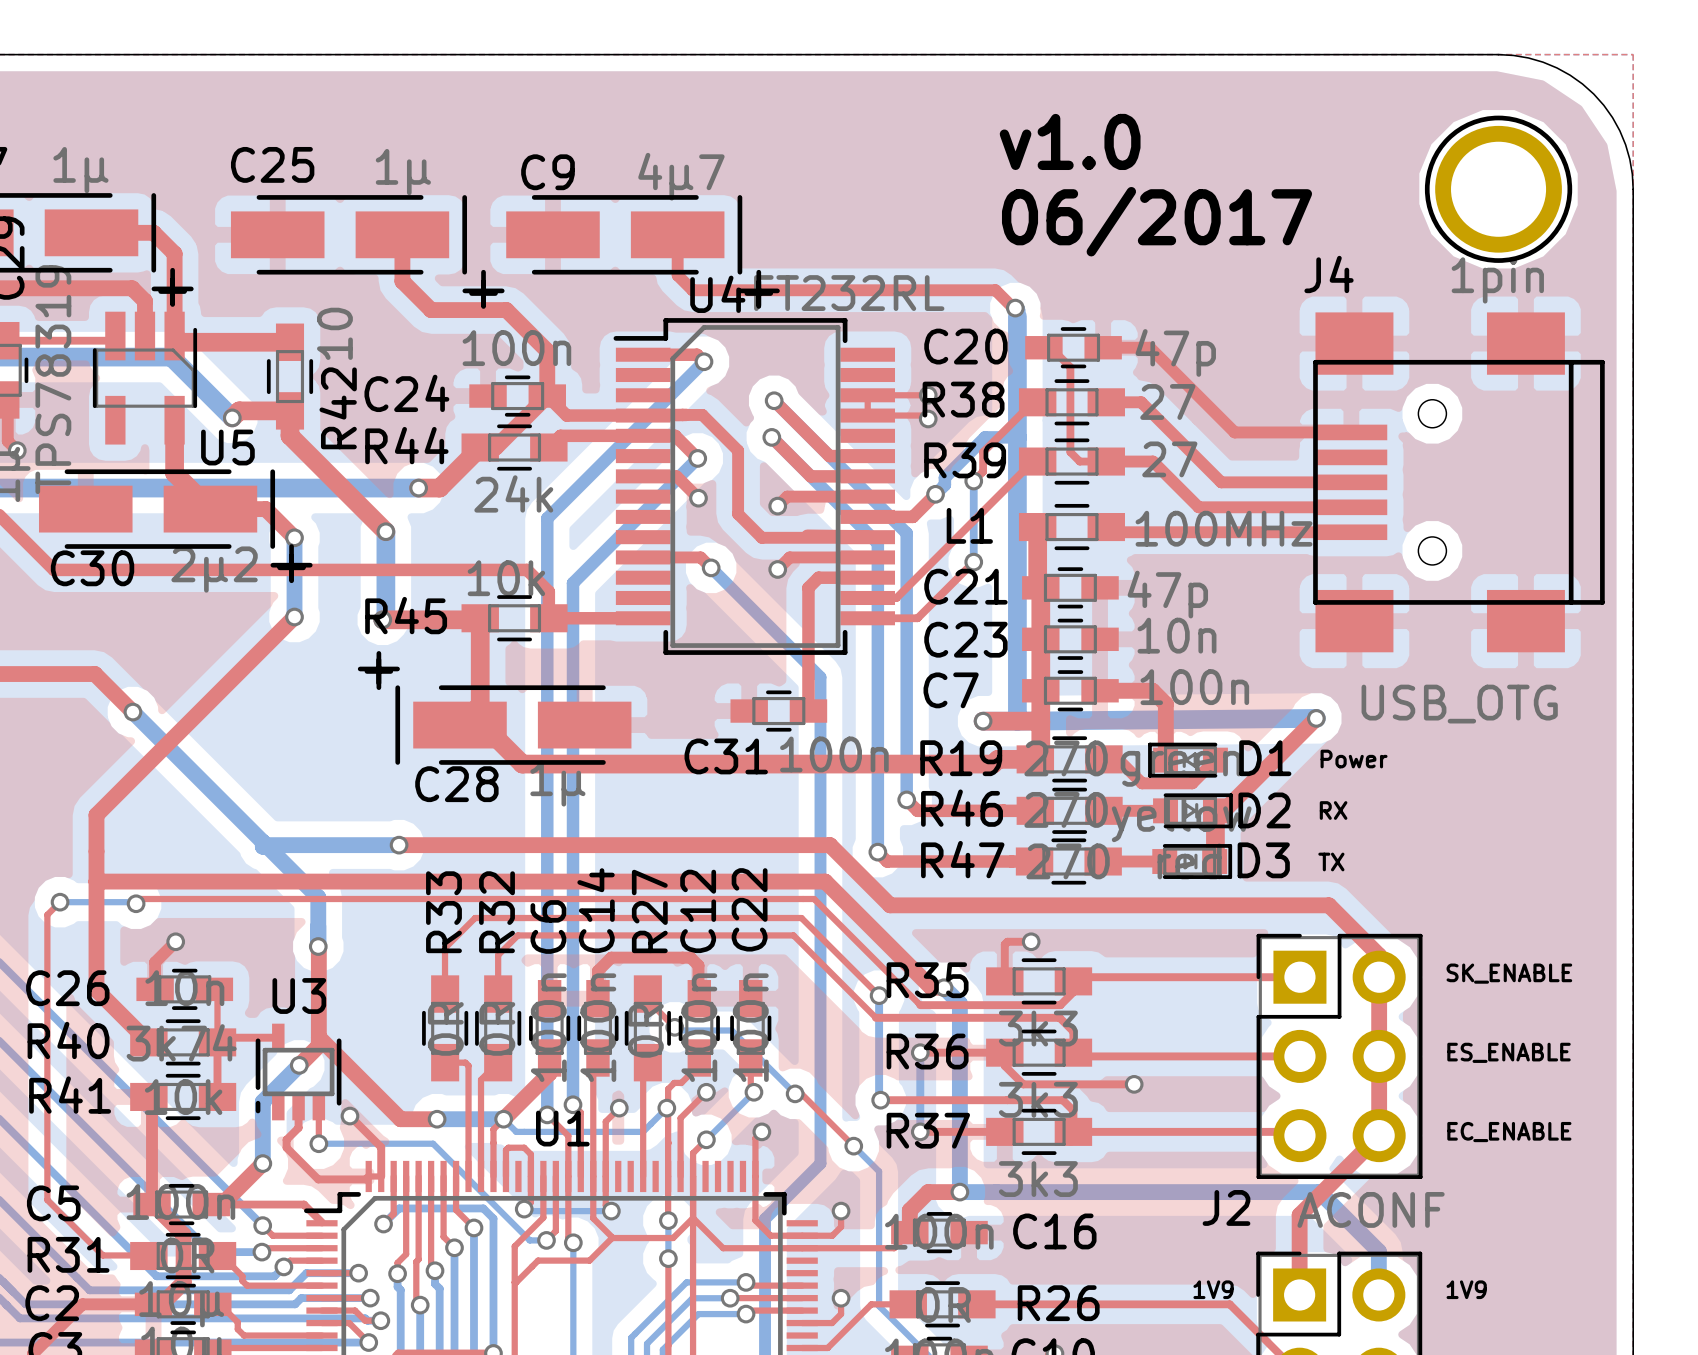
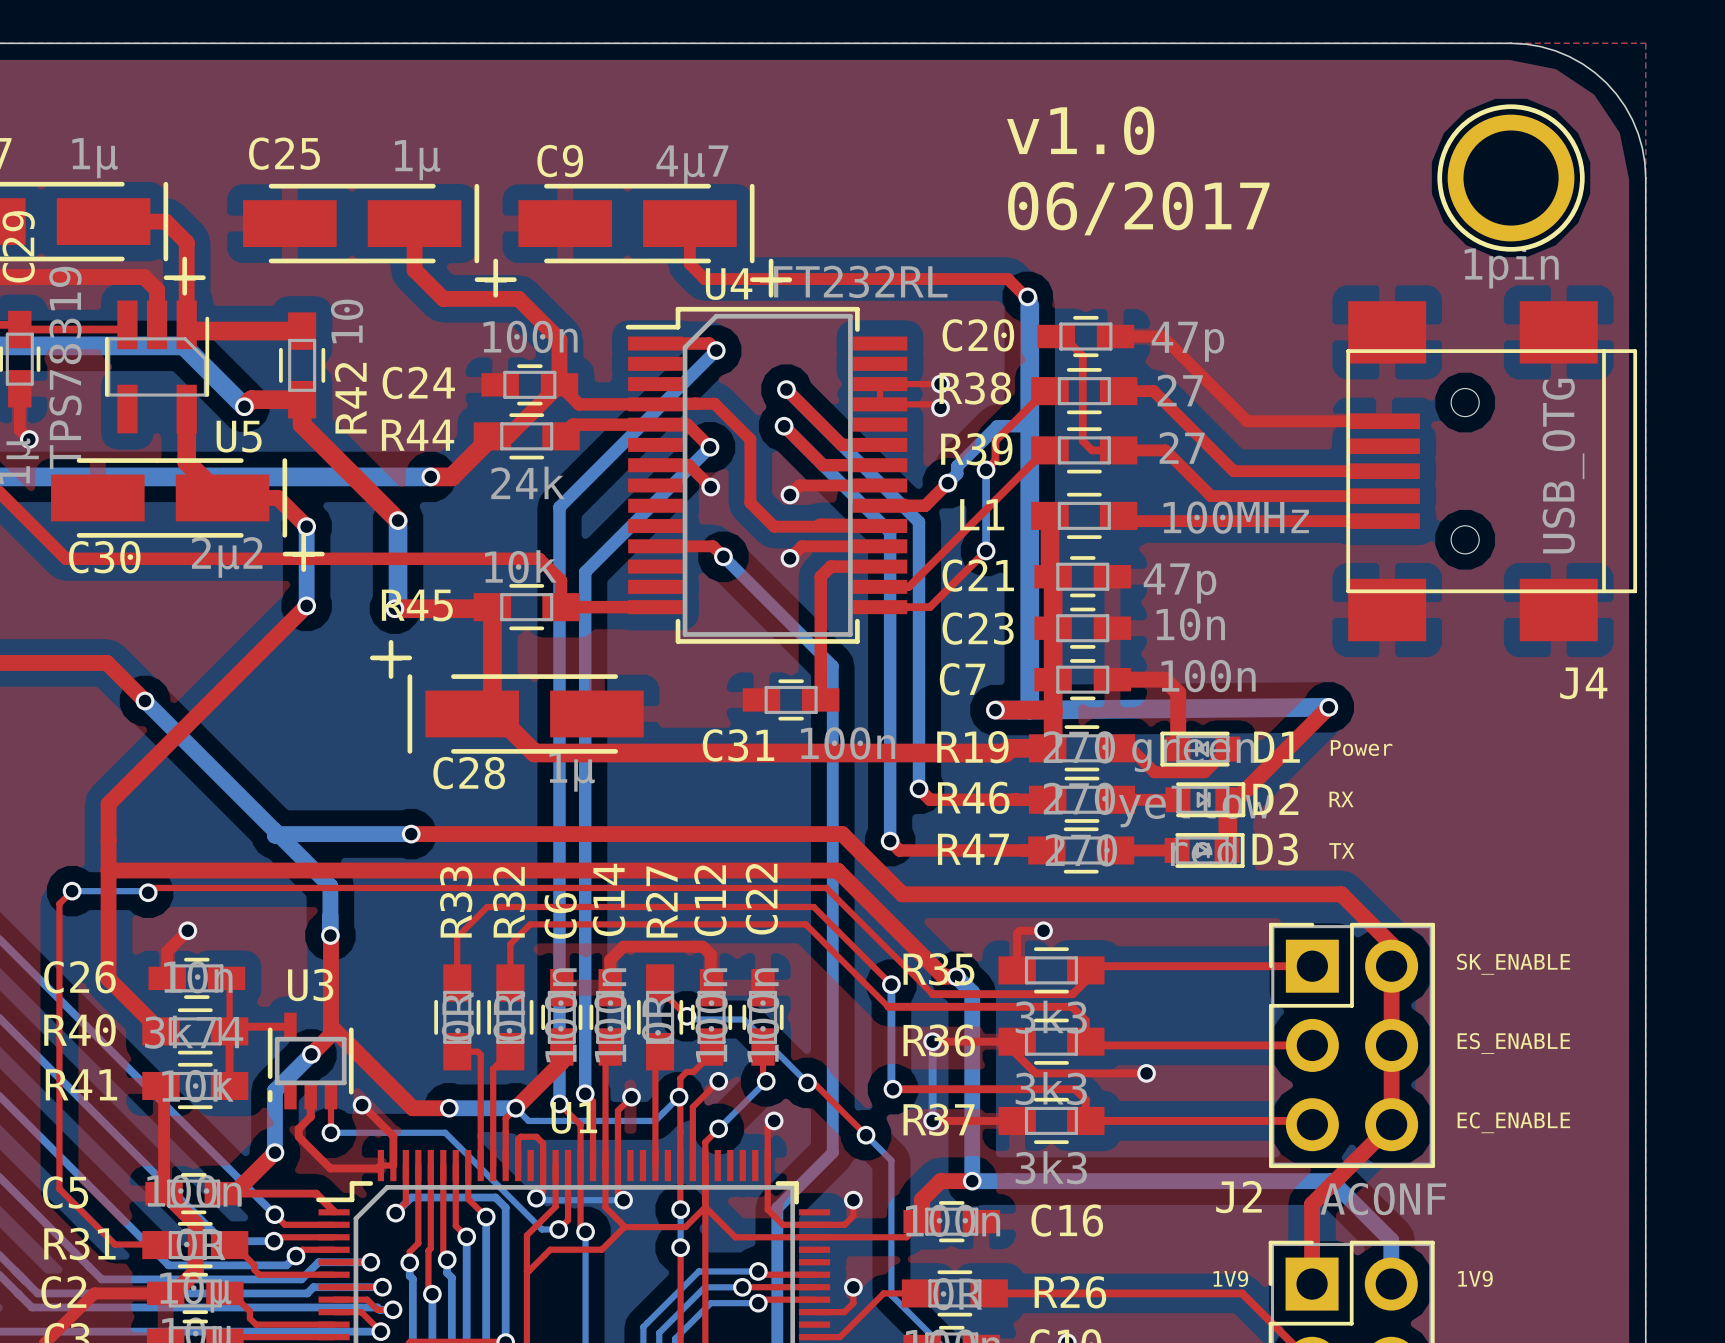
J4 name position: J4 (1329, 274) -> J4 (1583, 683)
J4 footprint: [1313, 312, 1605, 653] -> [1346, 301, 1638, 642]
J4 value rotation: 0° (1459, 704) -> 90° counterclockwise (1563, 466)
J4 value position: USB_OTG (1459, 704) -> USB_OTG (1563, 466)

